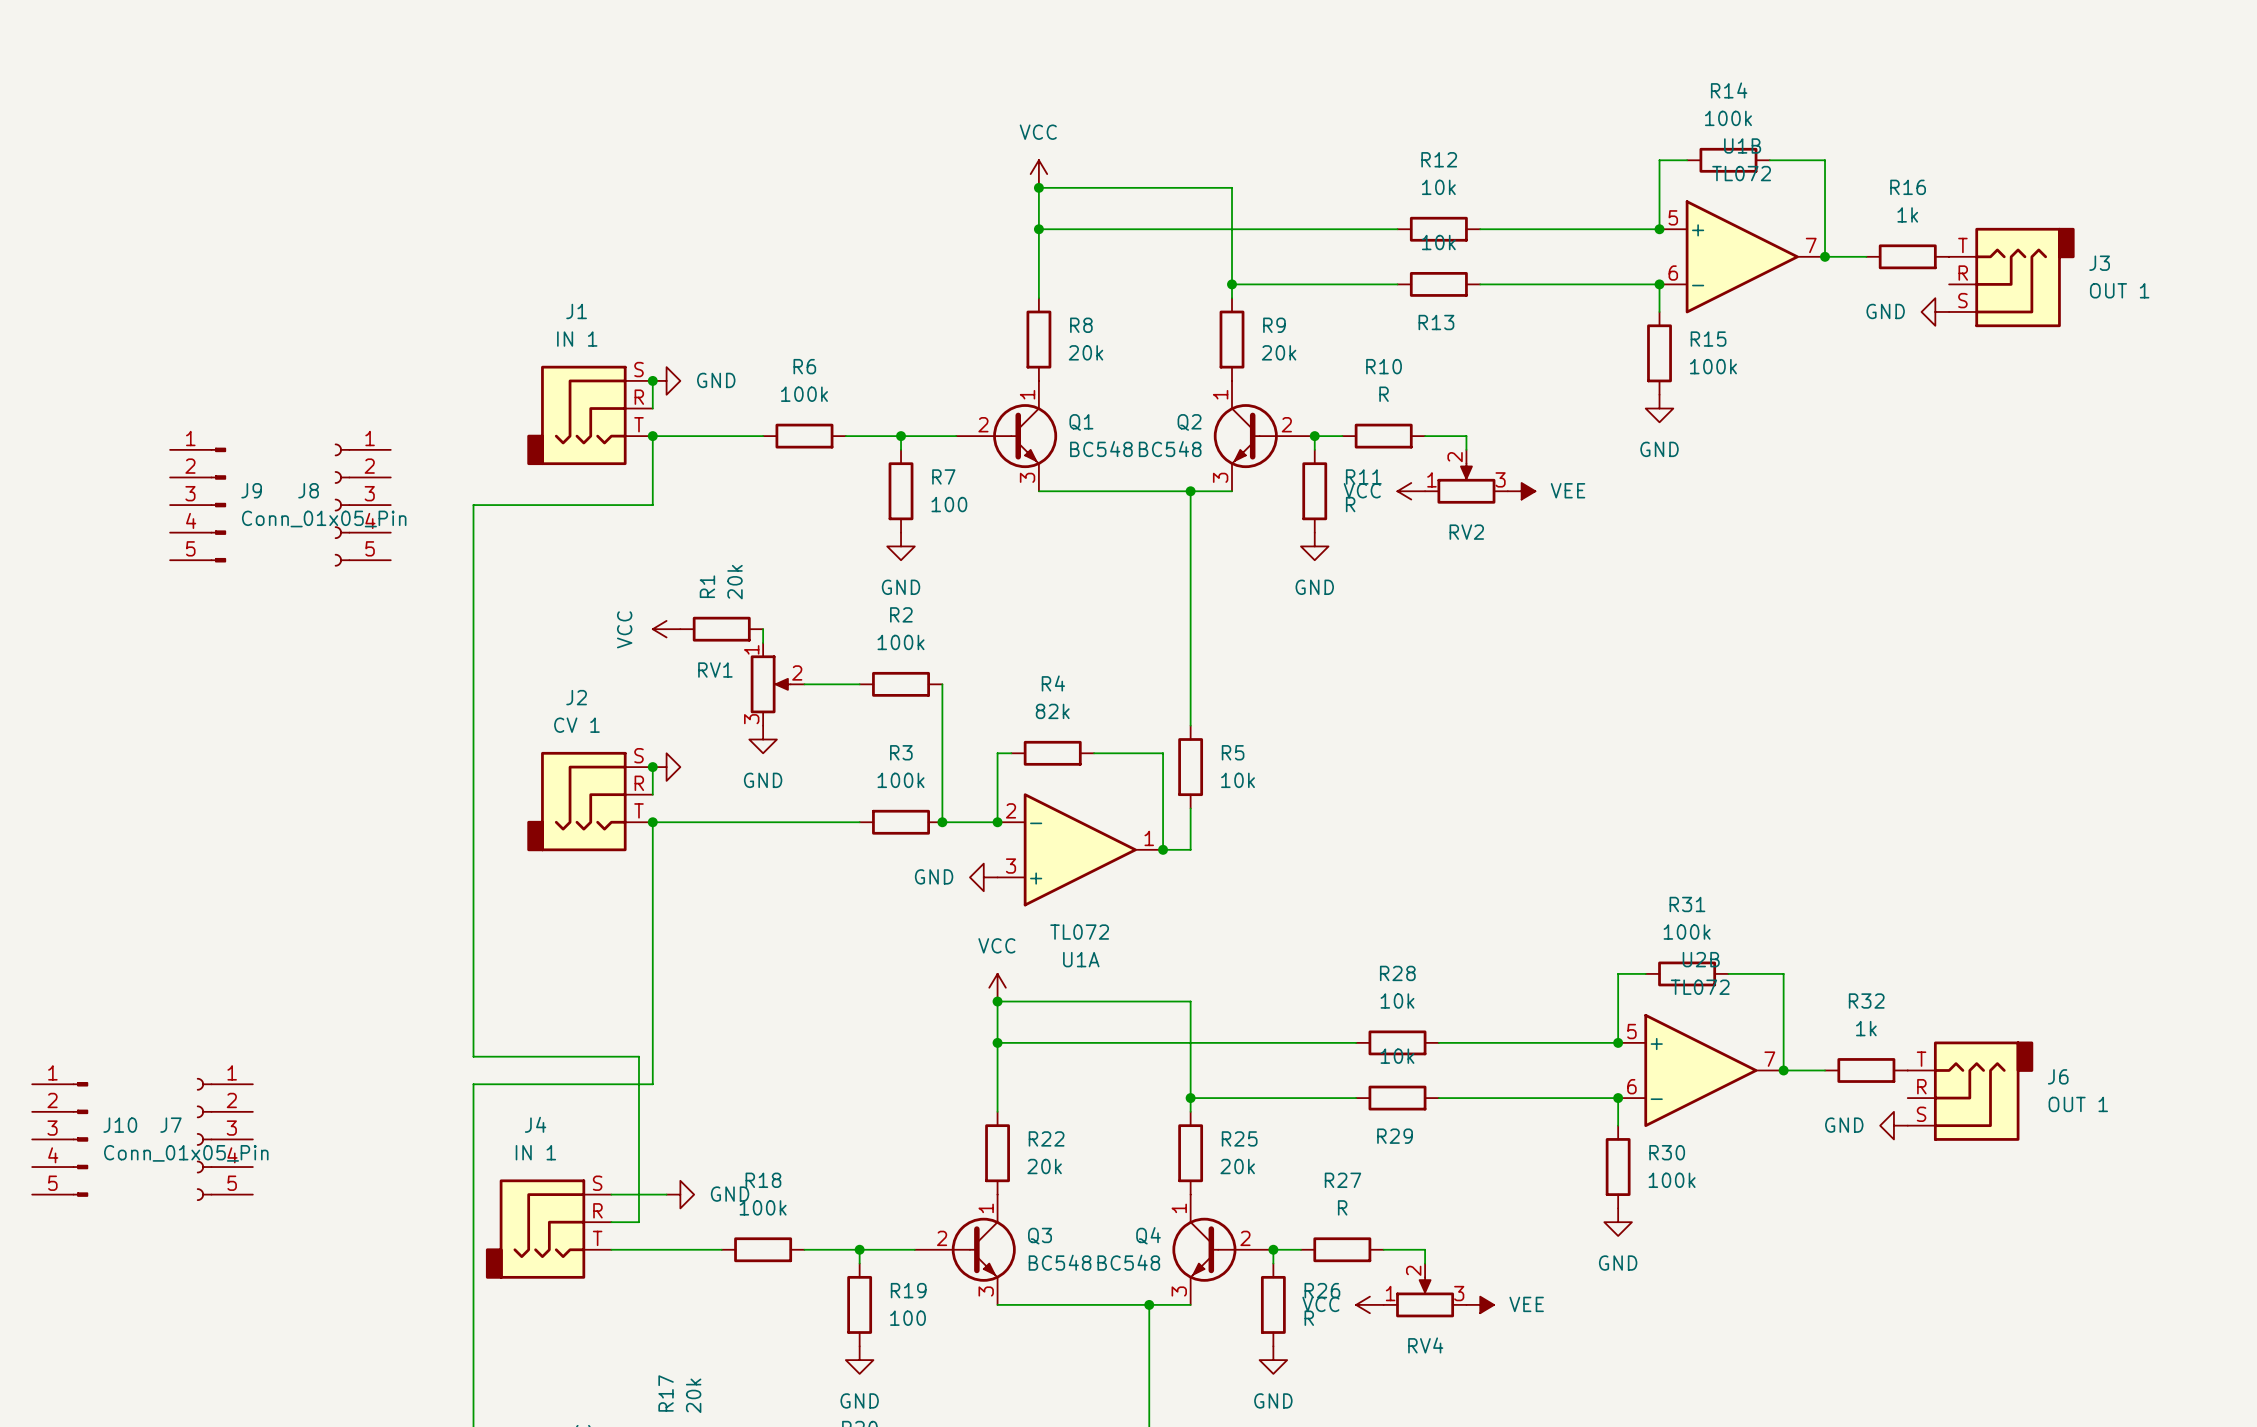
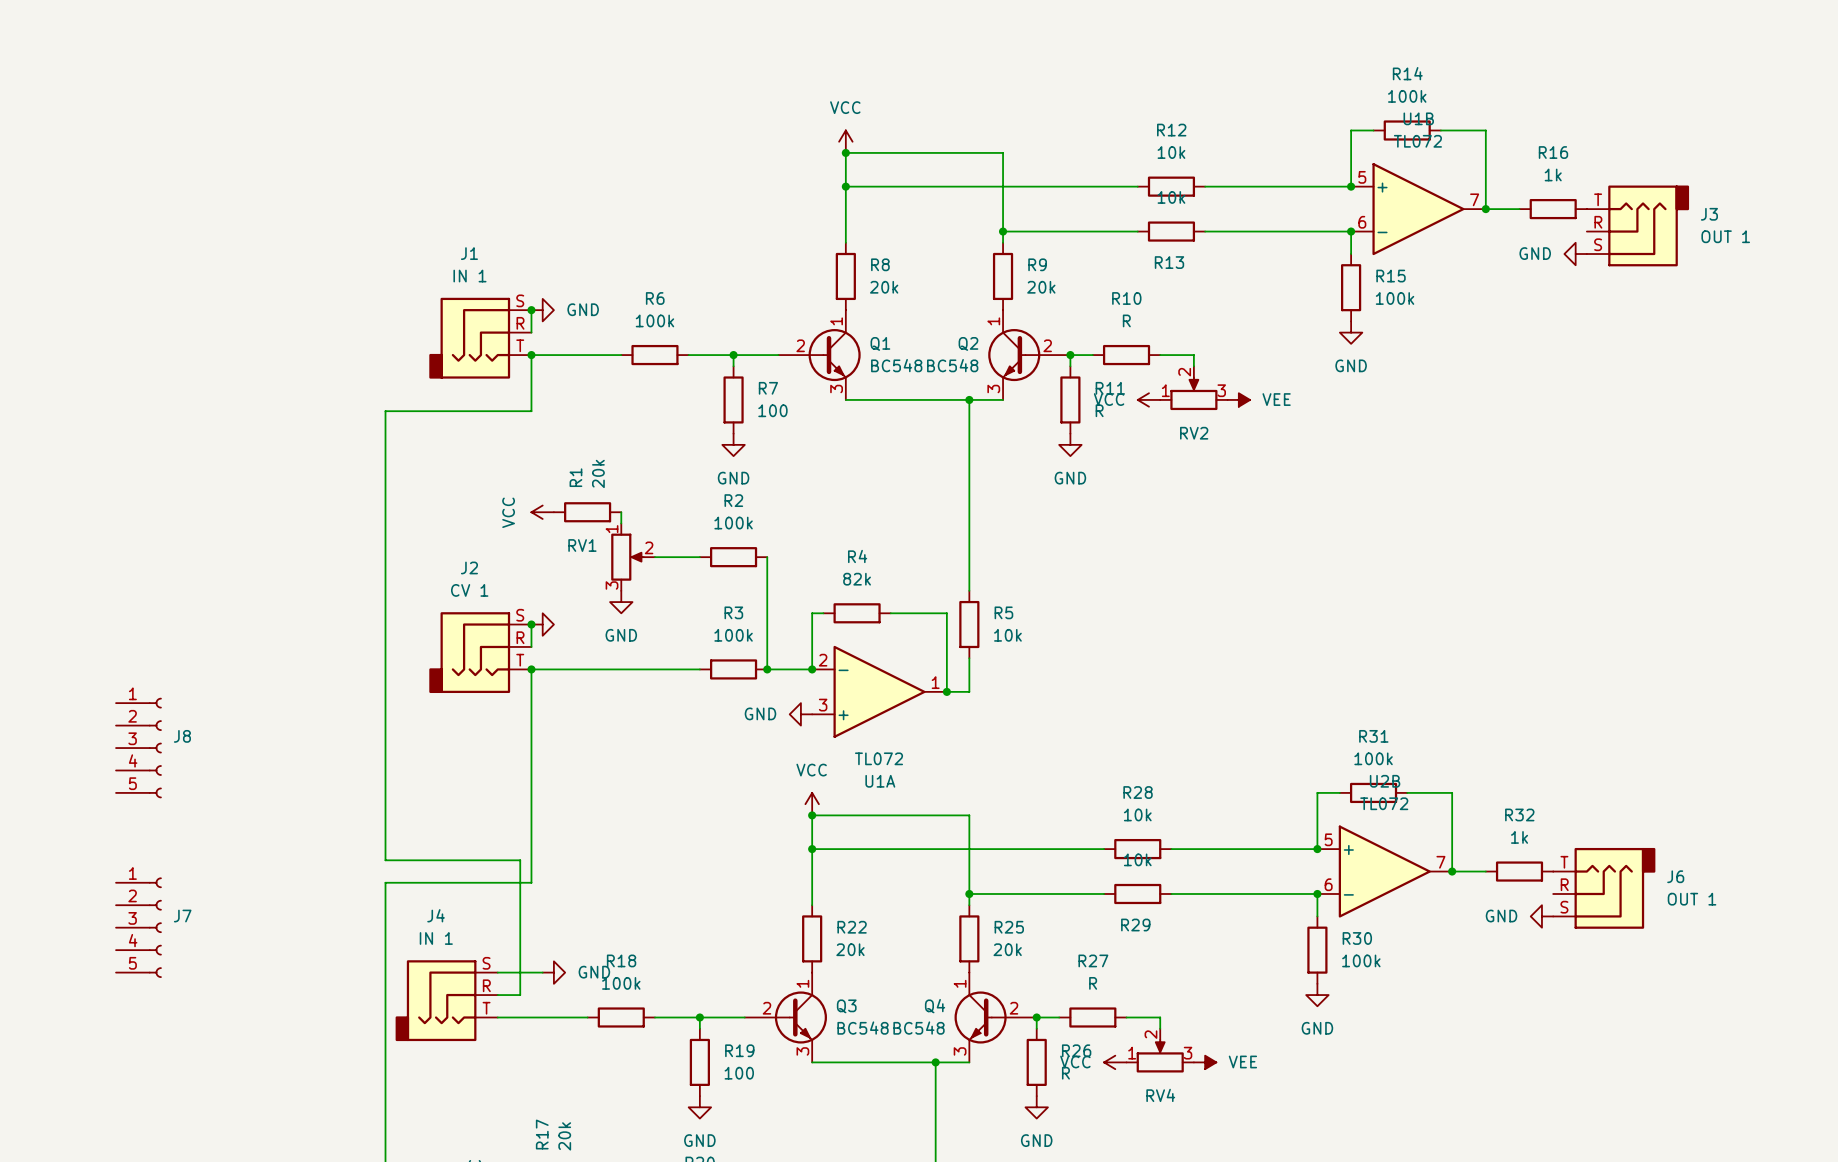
J9: Conn_01x05_Pin (198, 505) -> none
J8 flip: as is (342, 505) -> left-right (155, 748)
J8 position: (362, 505) -> (138, 748)
J10: Conn_01x05_Pin (60, 1139) -> none
J7 flip: as is (204, 1139) -> left-right (155, 927)

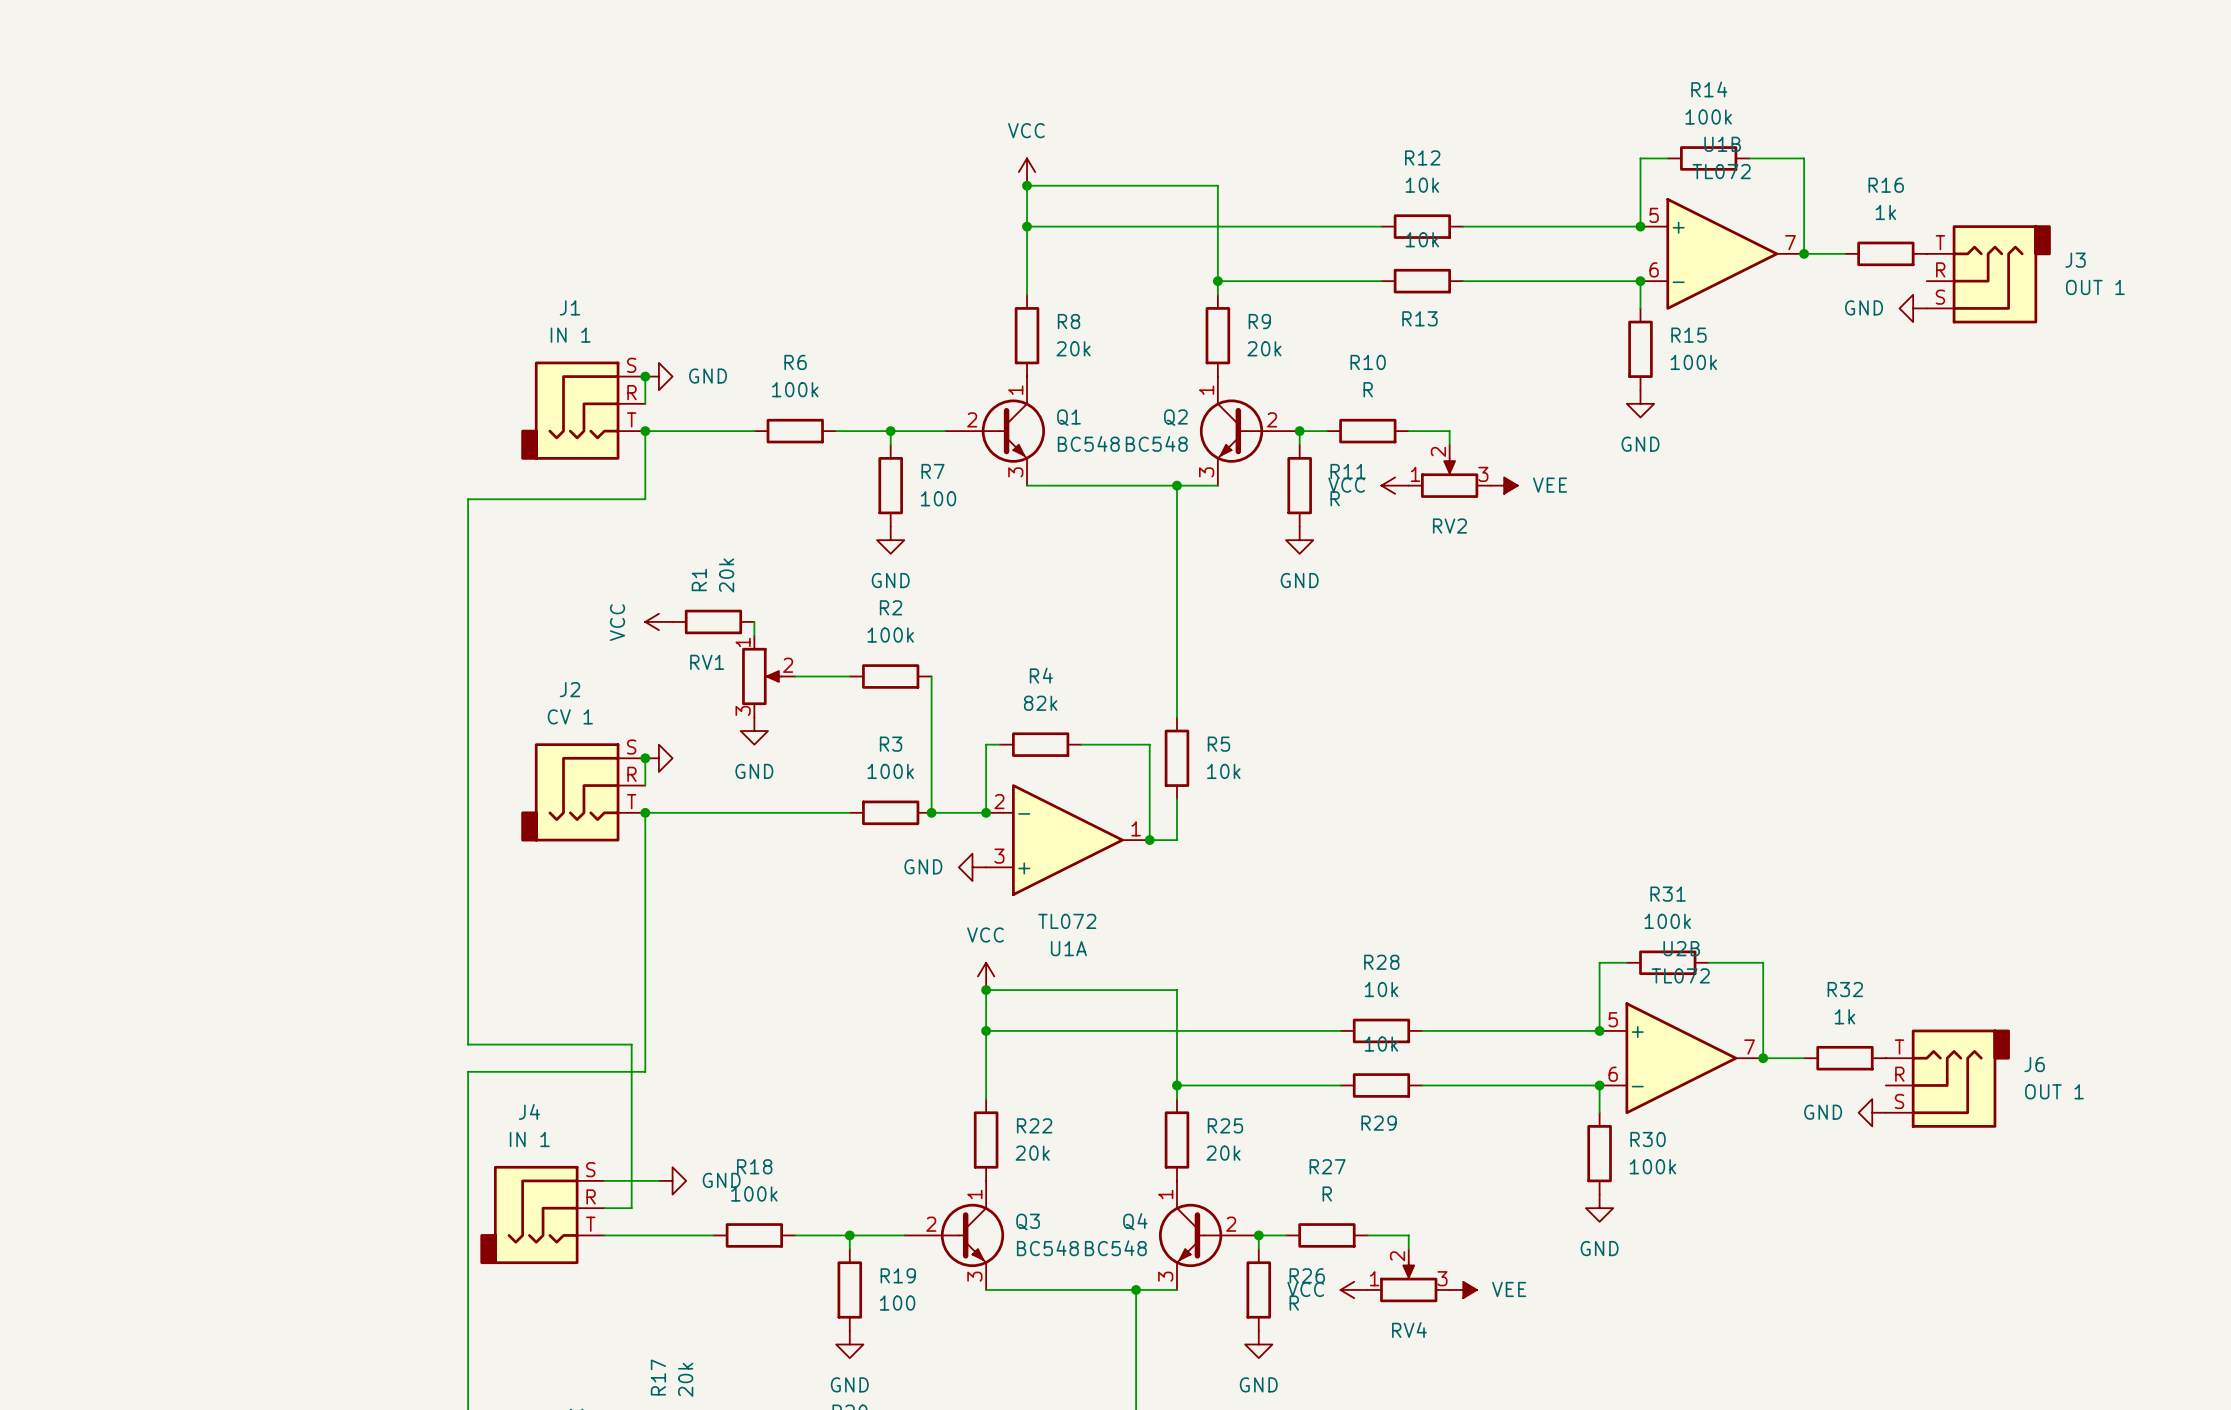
J8: (138, 748) -> none
J7: (138, 927) -> none

